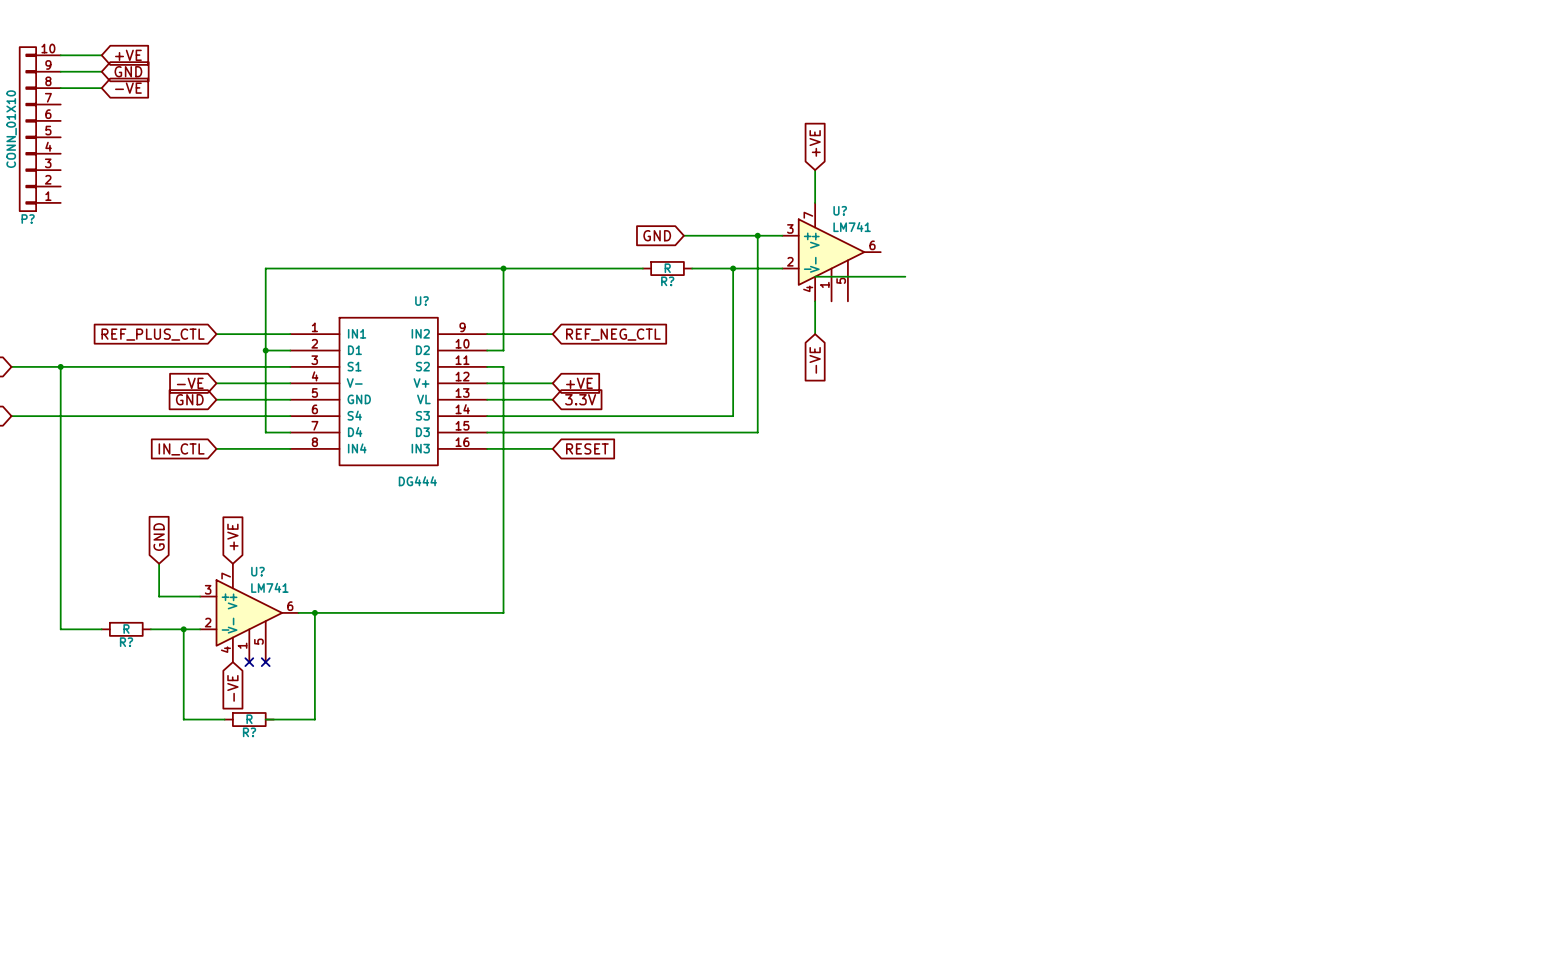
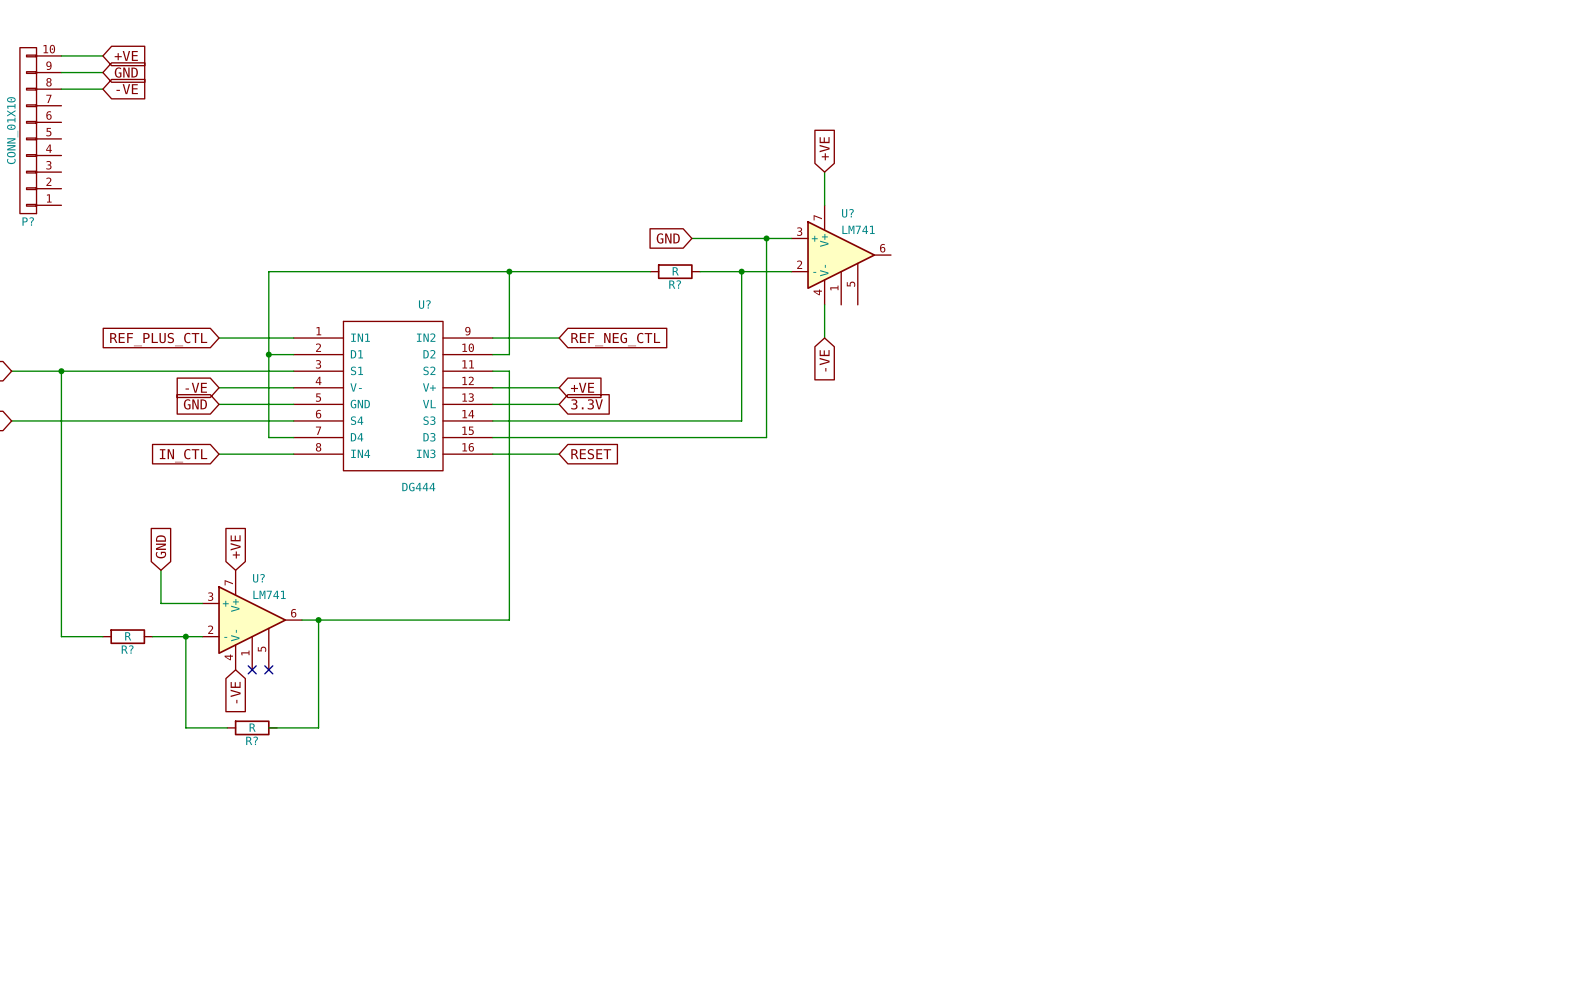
wire: (815, 276) (905, 276) -> none

